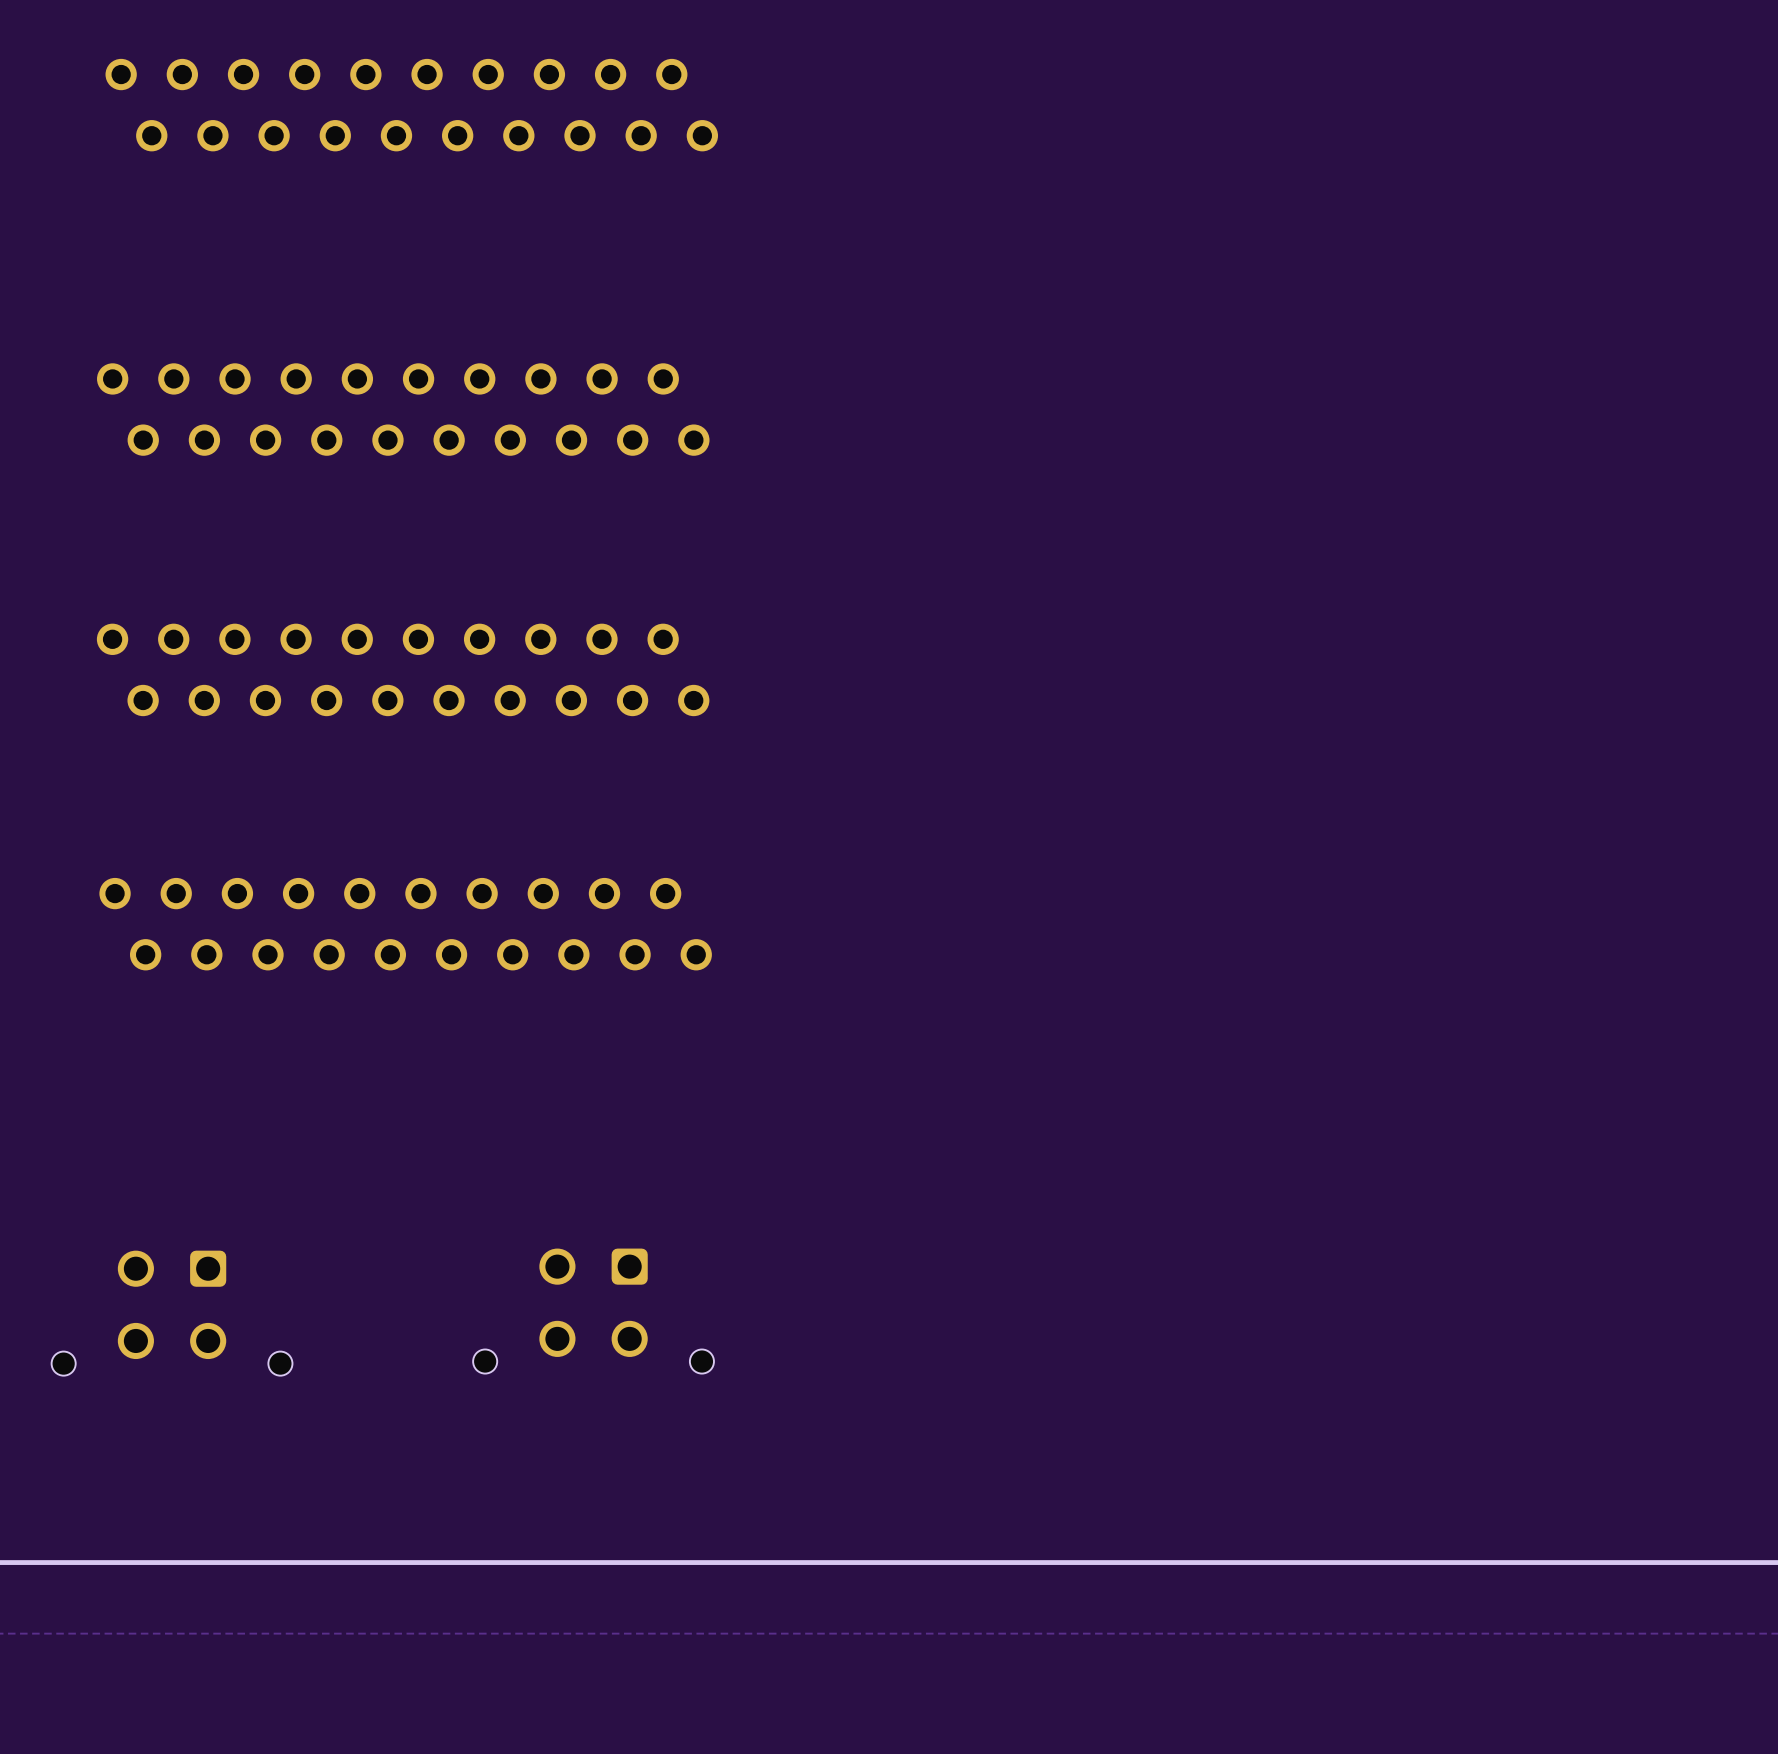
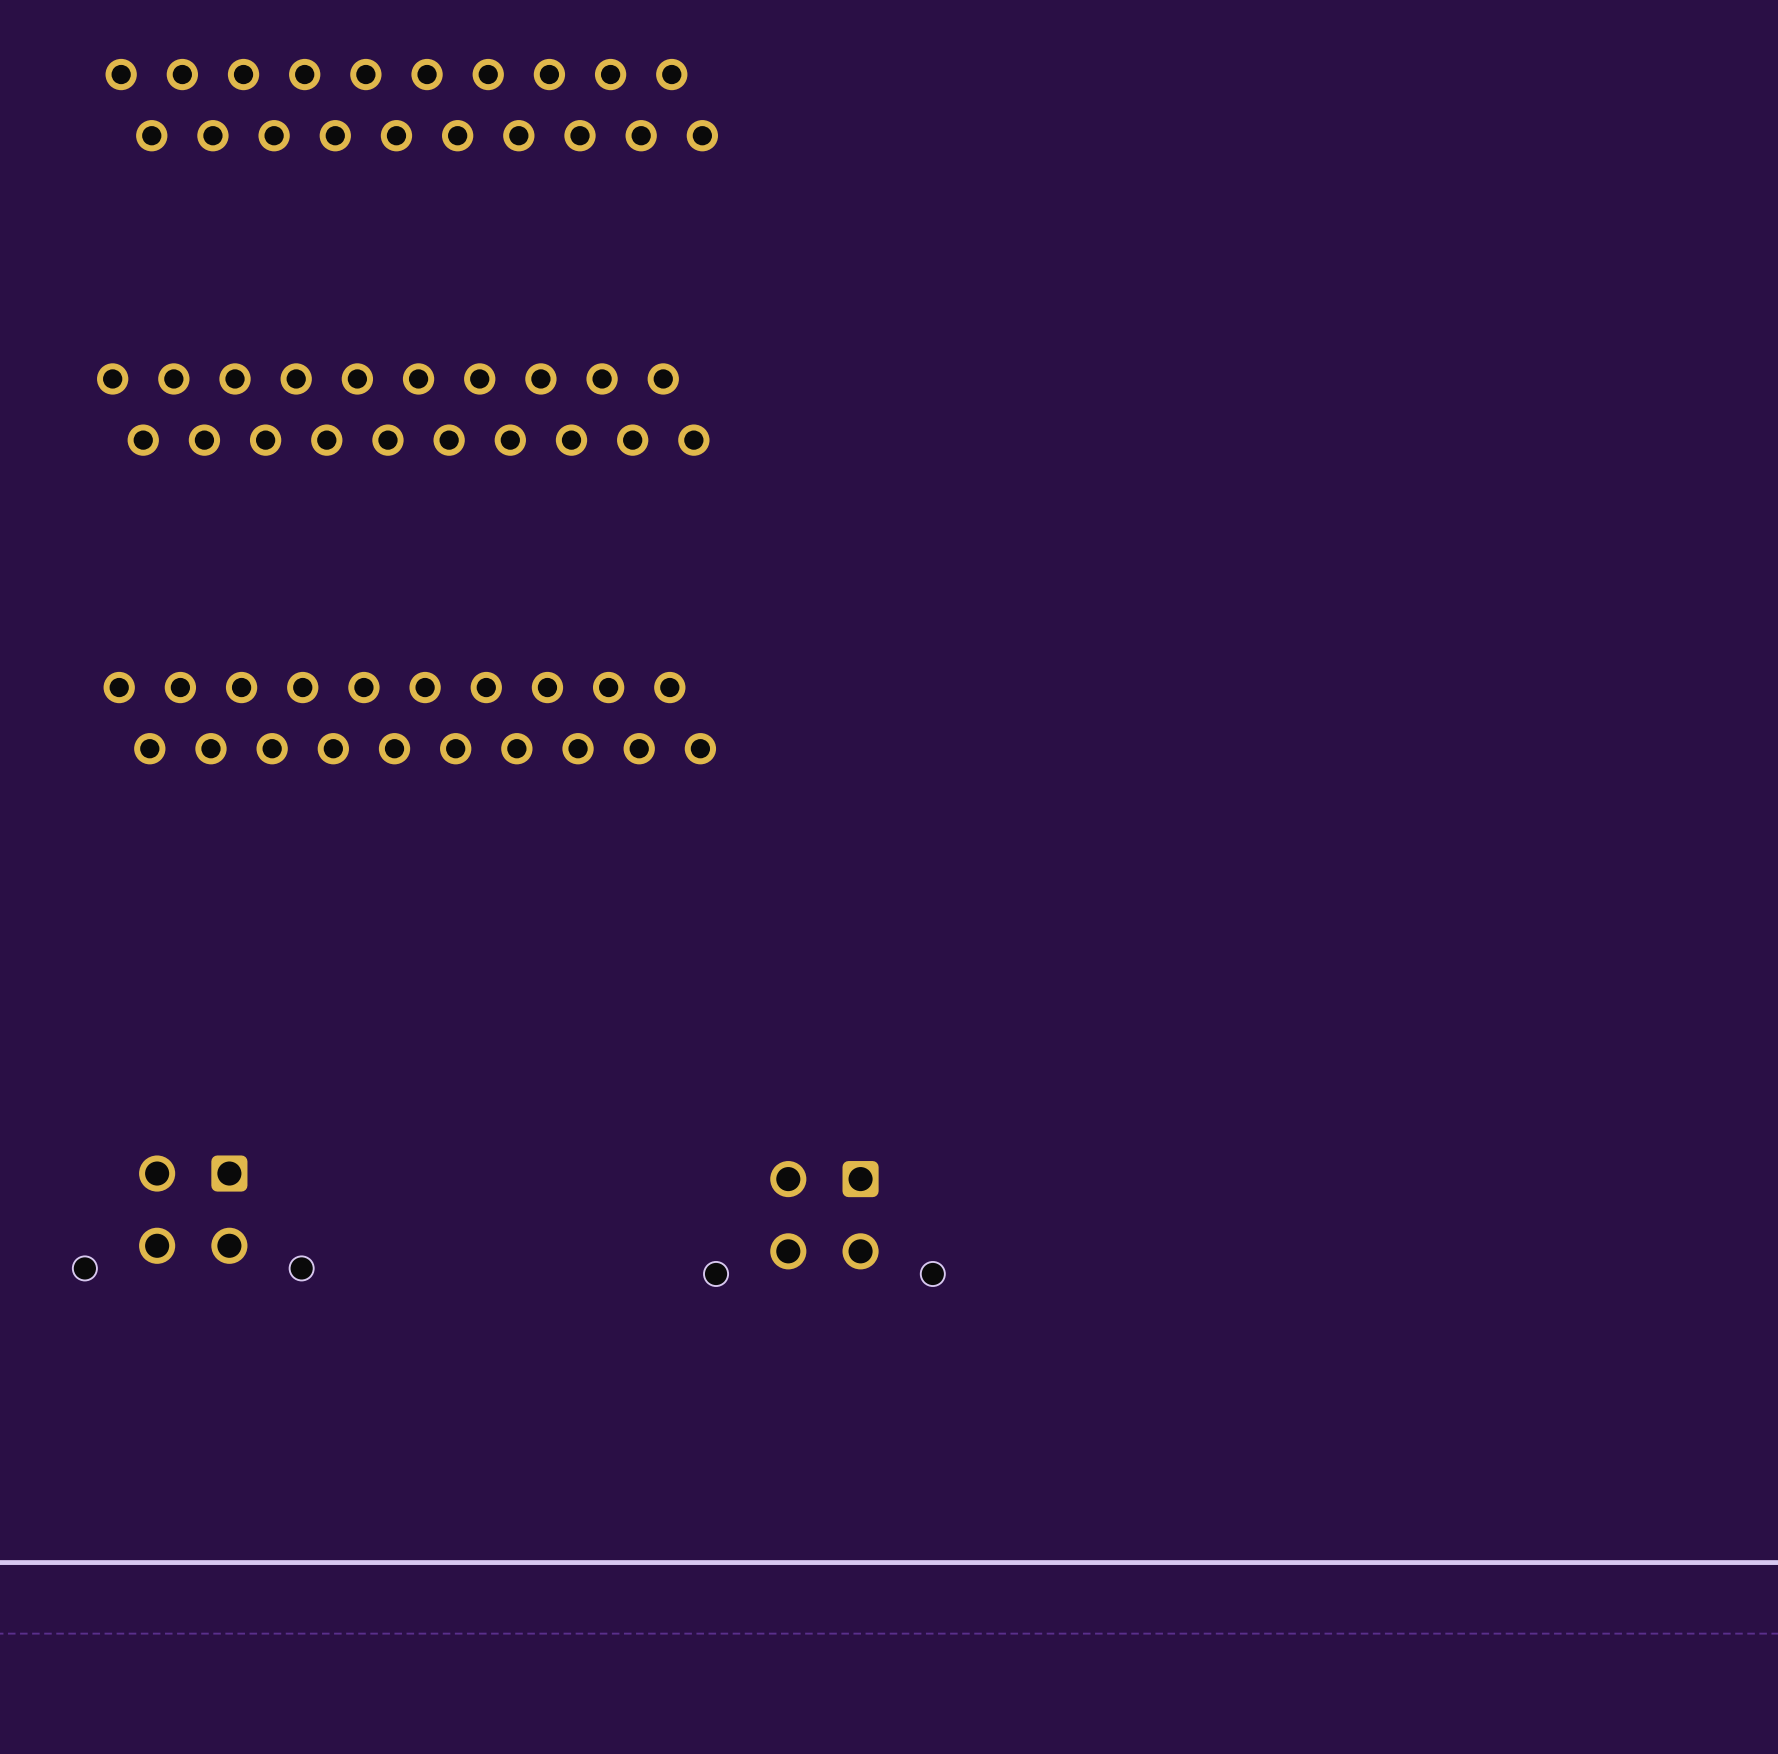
part position: (403, 669) -> (409, 718)
part: (405, 924) -> none
part: none -> (824, 1223)
part: (593, 1311) -> none
part position: (172, 1313) -> (193, 1217)

